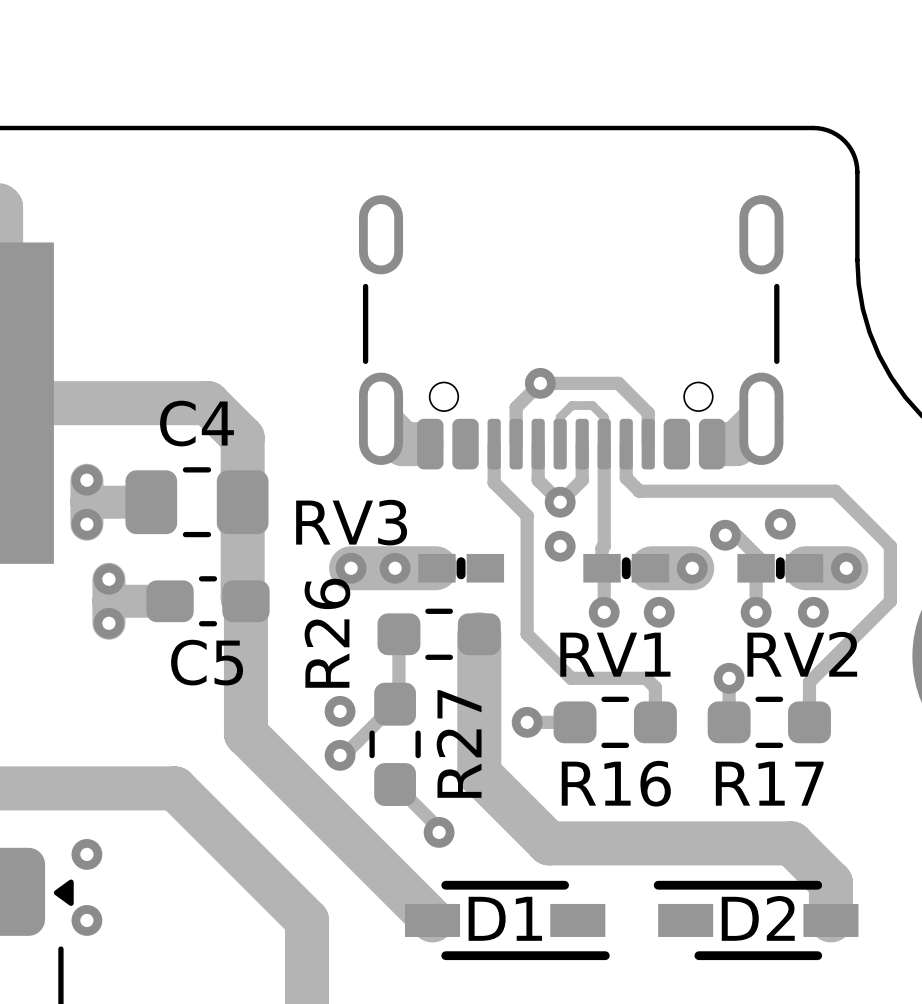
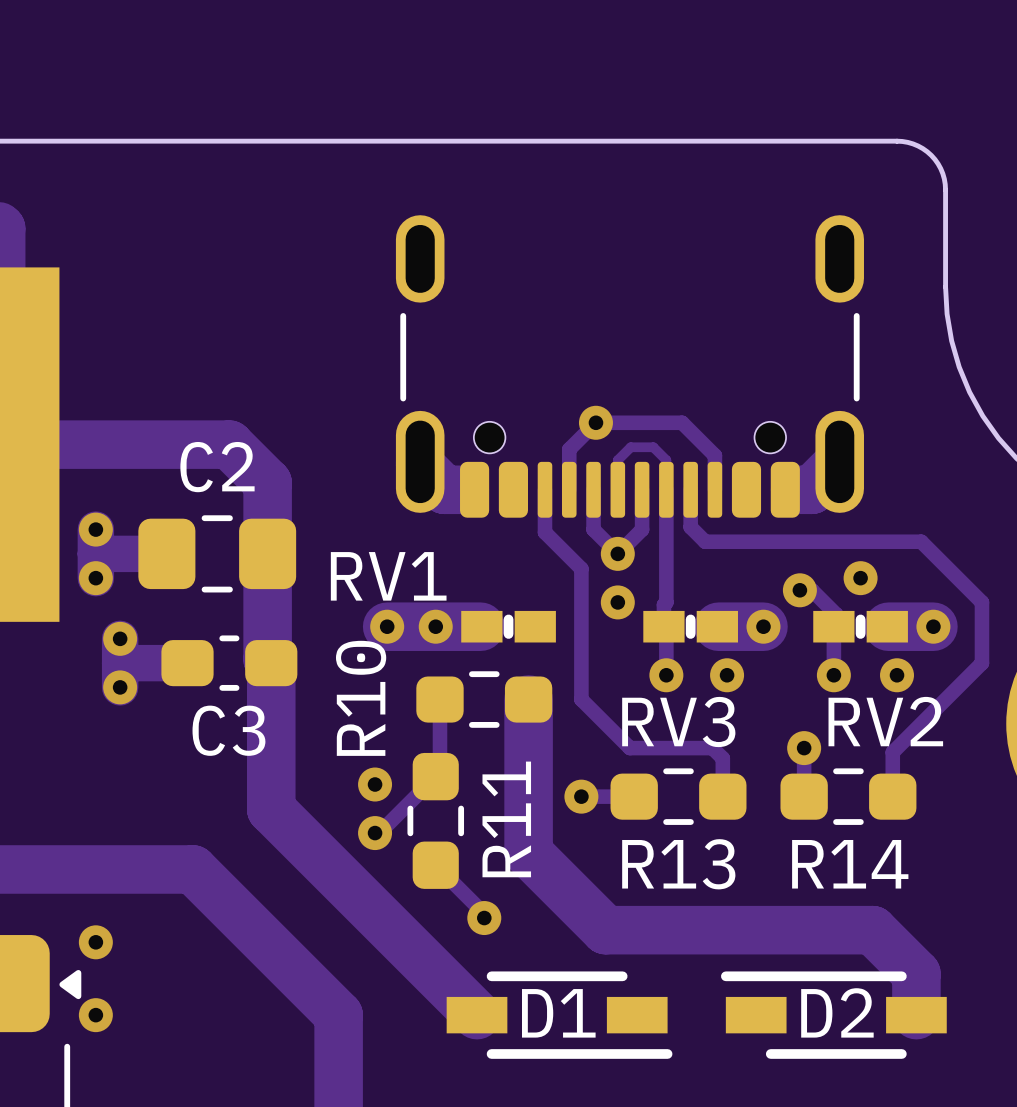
C4 name: C4 (196, 423) -> C2 (217, 467)
RV3 name: RV3 (351, 522) -> RV1 (388, 576)
R26 name: R26 (327, 633) -> R10 (361, 698)
RV1 name: RV1 (615, 654) -> RV3 (678, 722)
C5 name: C5 (207, 662) -> C3 (228, 730)
R27 name: R27 (459, 743) -> R11 (506, 819)
R16 name: R16 (616, 783) -> R13 (678, 864)
R17 name: R17 (769, 783) -> R14 (850, 864)

